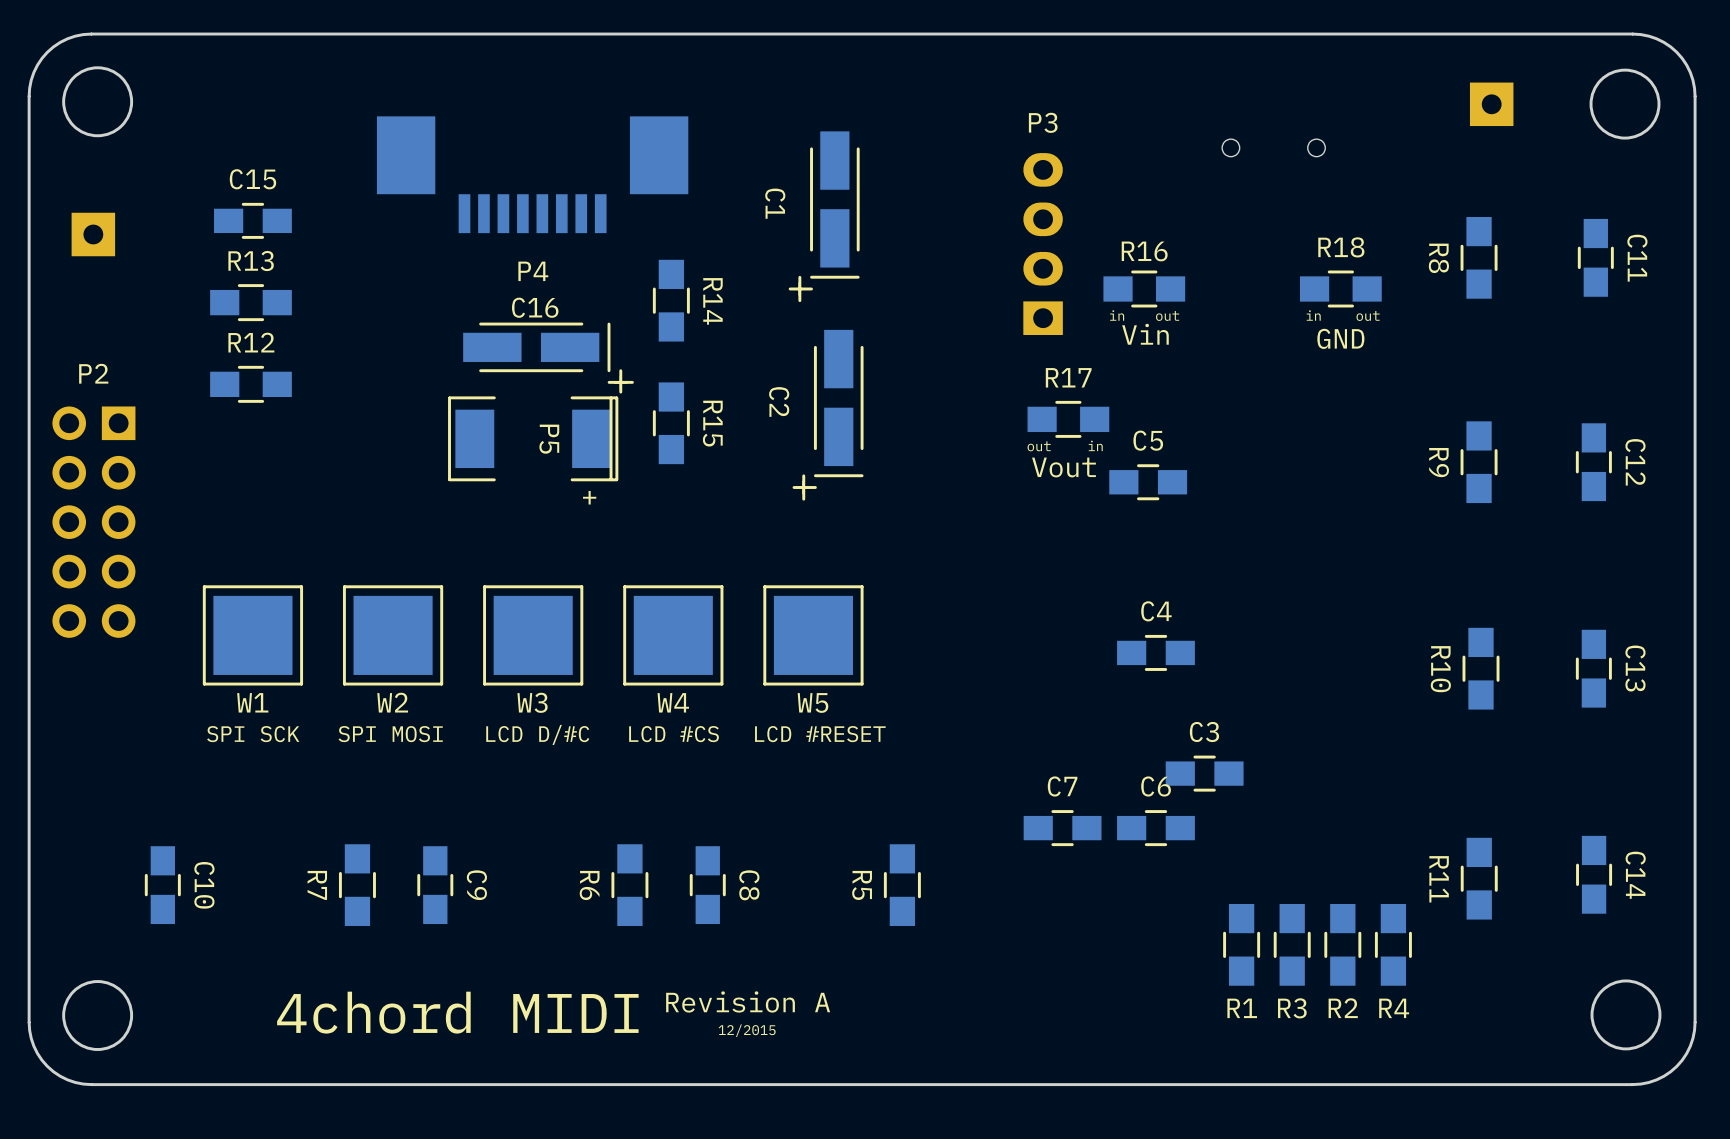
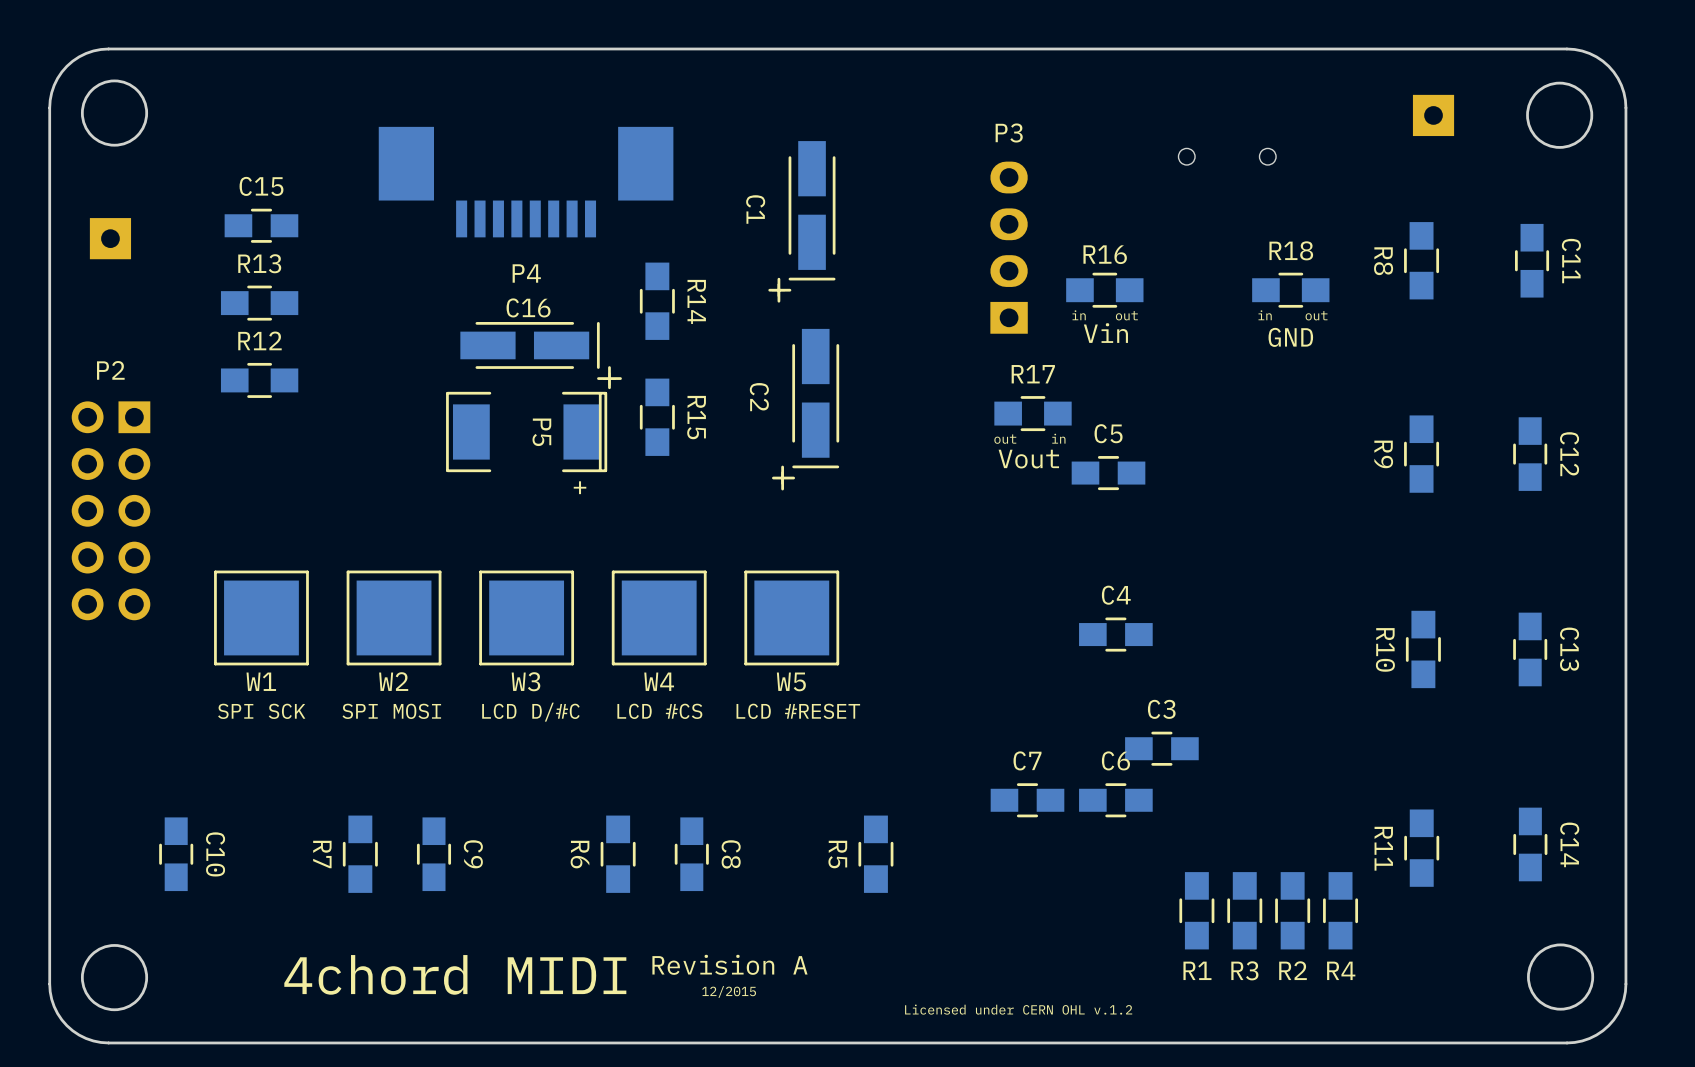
text: none -> Licensed under CERN OHL v.1.2 (1018, 1009)

